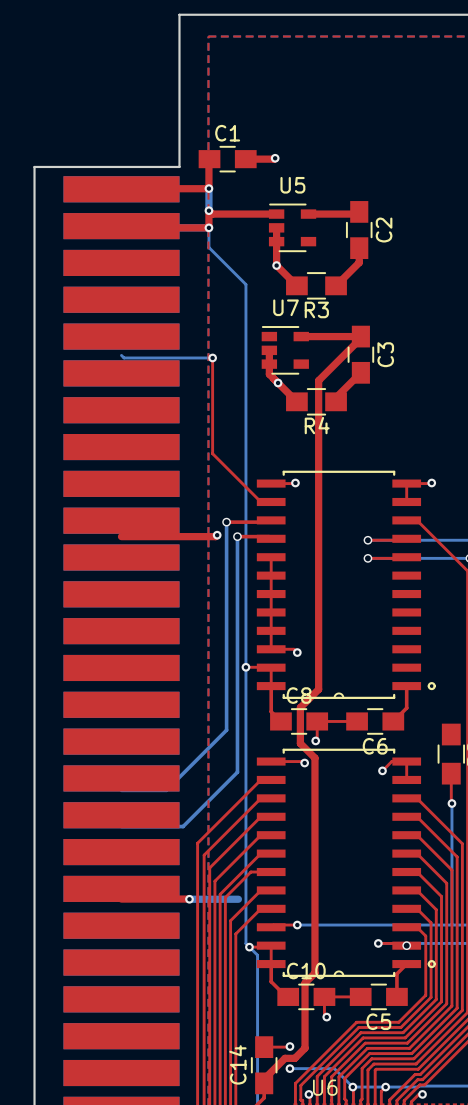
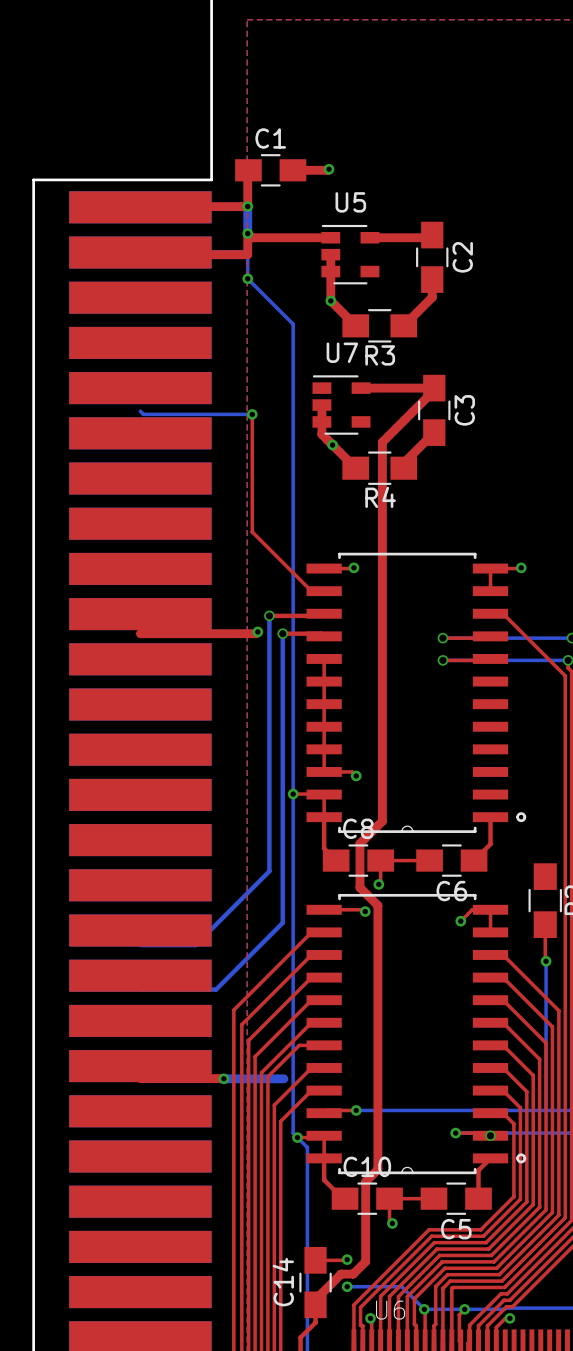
via position: (208, 227) -> (247, 278)

